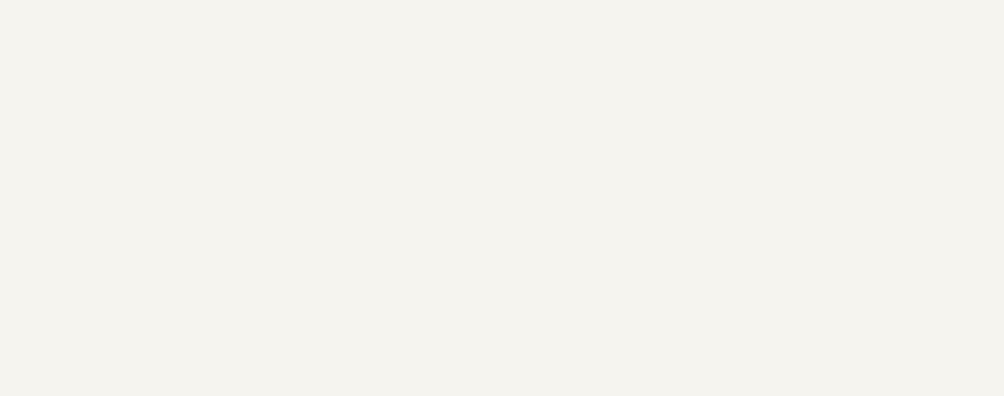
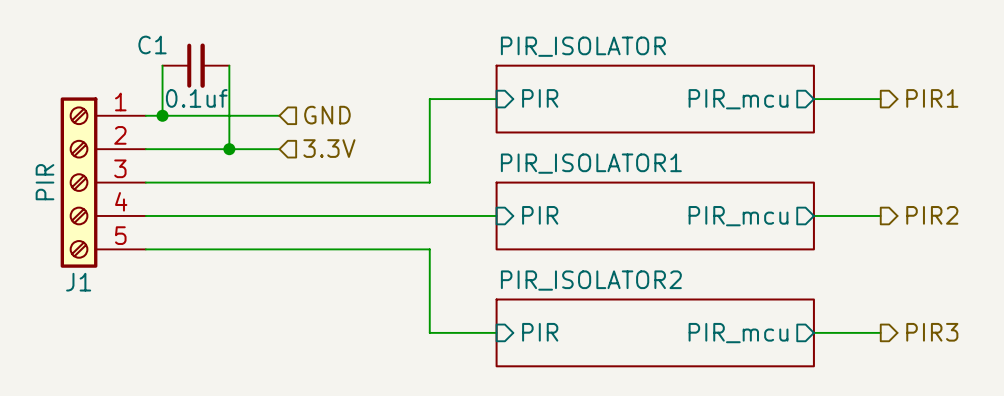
wire: none -> (162, 65) (162, 115)
C1: none -> 0.1uf (195, 65)
wire: none -> (229, 65) (229, 149)
sheet pin: none -> PIR (540, 98)
hierarchical label: none -> PIR1 (932, 98)
wire: none -> (496, 99) (429, 99) (429, 182) (145, 182)
sheet PIR_ISOLATOR: none -> (655, 99)
sheet pin: none -> PIR_mcu (738, 99)
wire: none -> (813, 99) (880, 99)
wire: none -> (145, 115) (279, 115)
junction: none -> (162, 115)
hierarchical label: none -> GND (327, 115)
hierarchical label: none -> 3.3V (329, 148)
wire: none -> (145, 149) (279, 149)
junction: none -> (229, 149)
J1: none -> PIR (103, 182)
wire: none -> (145, 215) (496, 215)
sheet pin: none -> PIR (540, 215)
sheet PIR_ISOLATOR1: none -> (655, 215)
wire: none -> (813, 215) (880, 215)
hierarchical label: none -> PIR2 (932, 215)
sheet pin: none -> PIR_mcu (738, 216)
wire: none -> (145, 249) (429, 249) (429, 332) (496, 332)
sheet pin: none -> PIR (540, 332)
sheet PIR_ISOLATOR2: none -> (655, 332)
wire: none -> (813, 332) (880, 332)
hierarchical label: none -> PIR3 (932, 332)
sheet pin: none -> PIR_mcu (738, 333)

